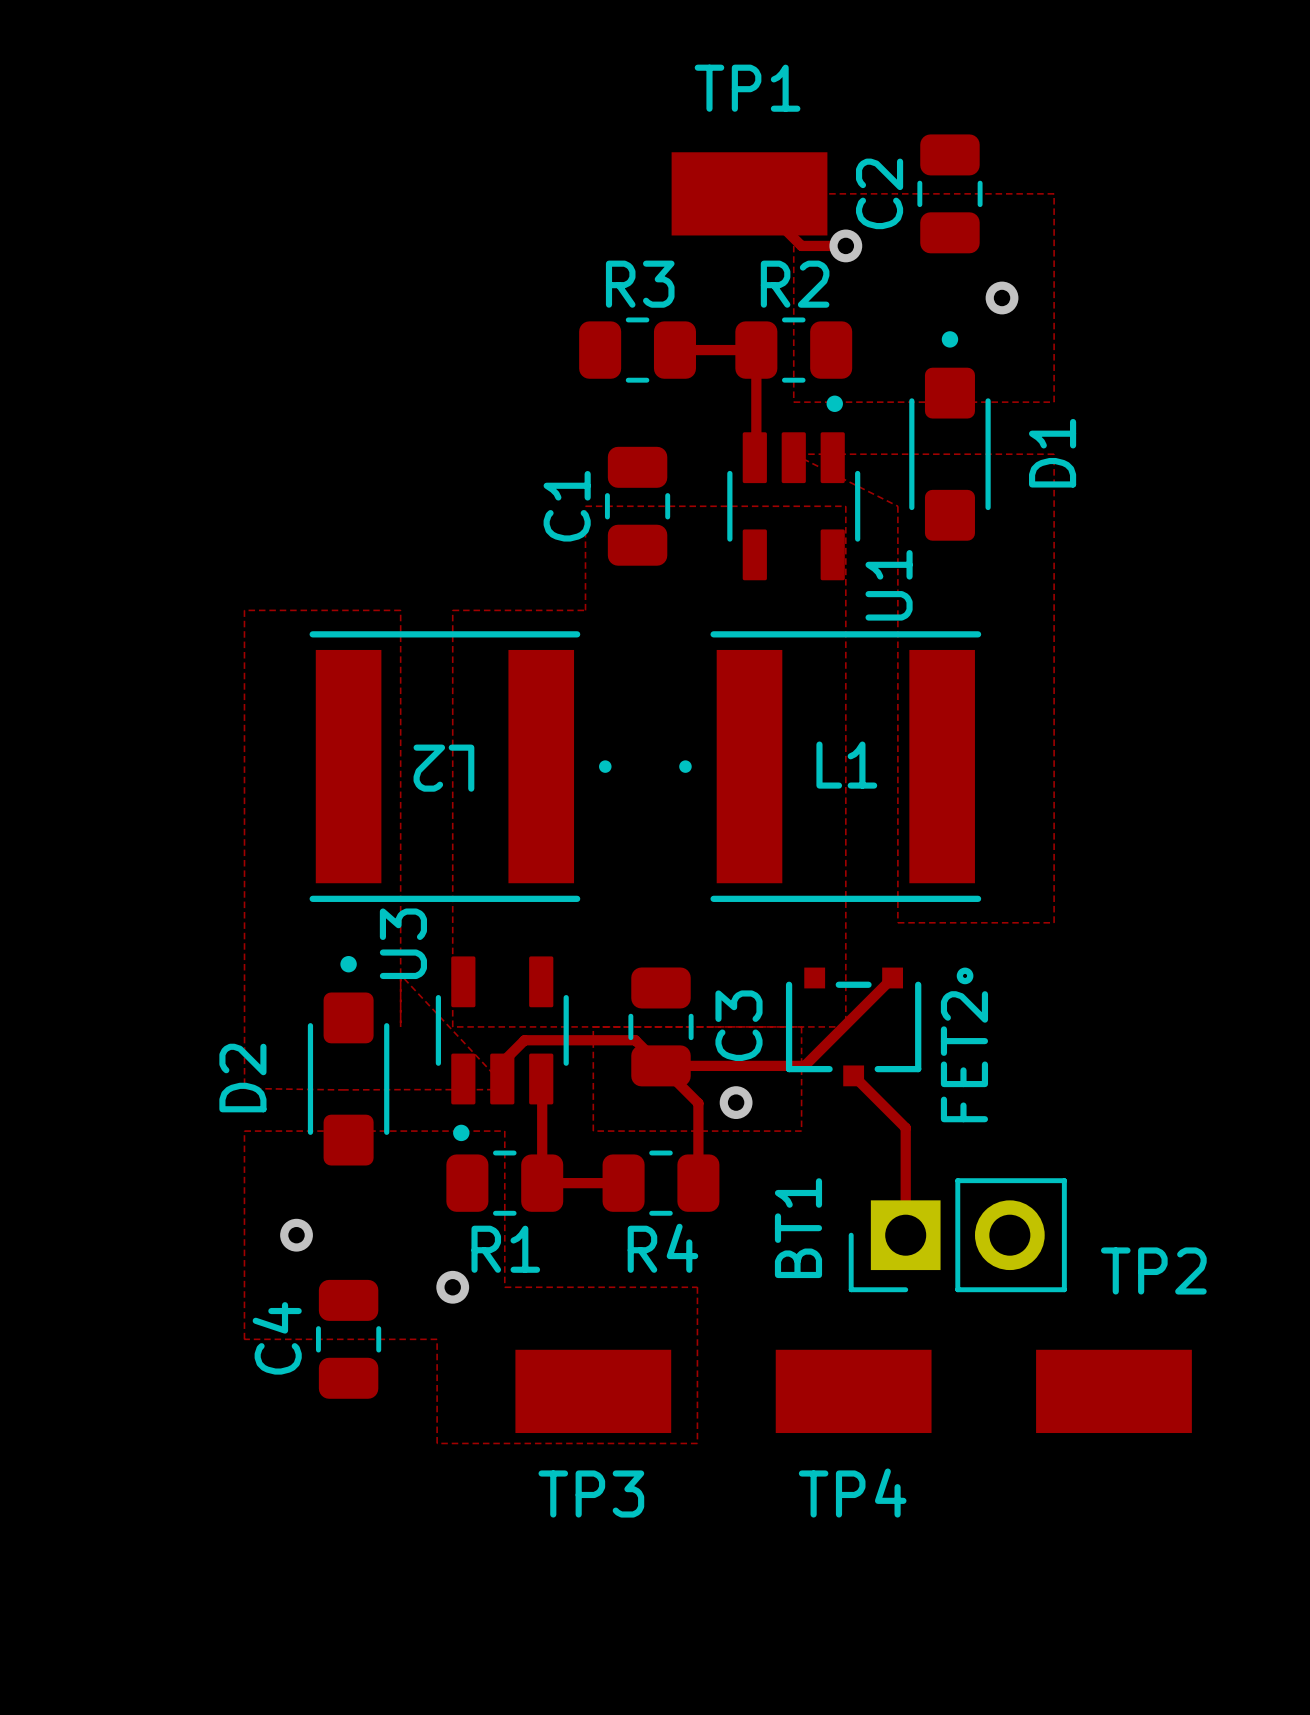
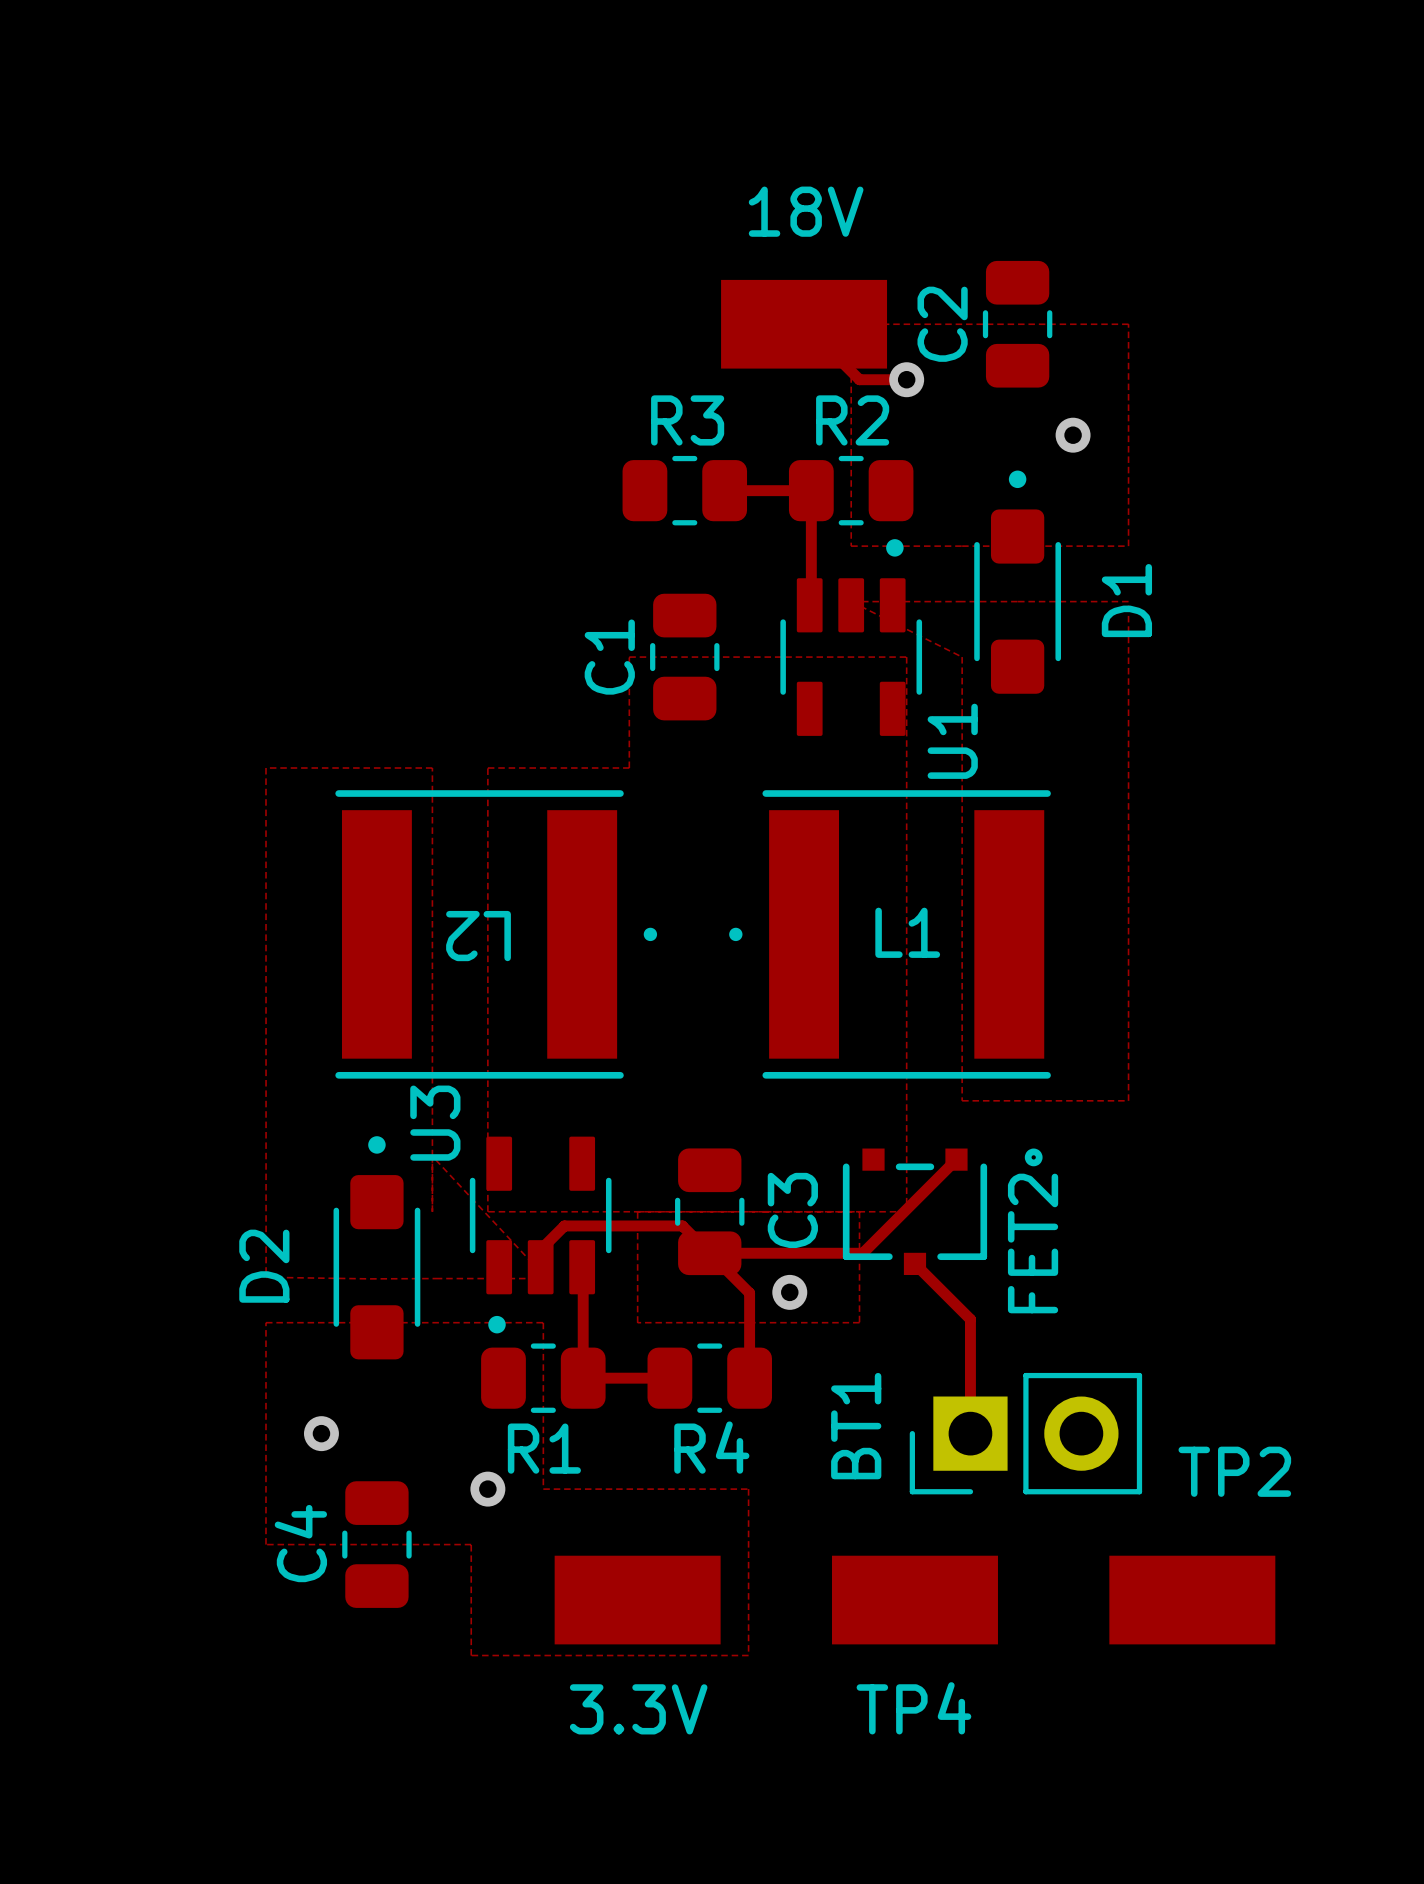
TP1 name: TP1 (747, 88) -> 18V (806, 211)
TP3 name: TP3 (591, 1494) -> 3.3V (638, 1709)

